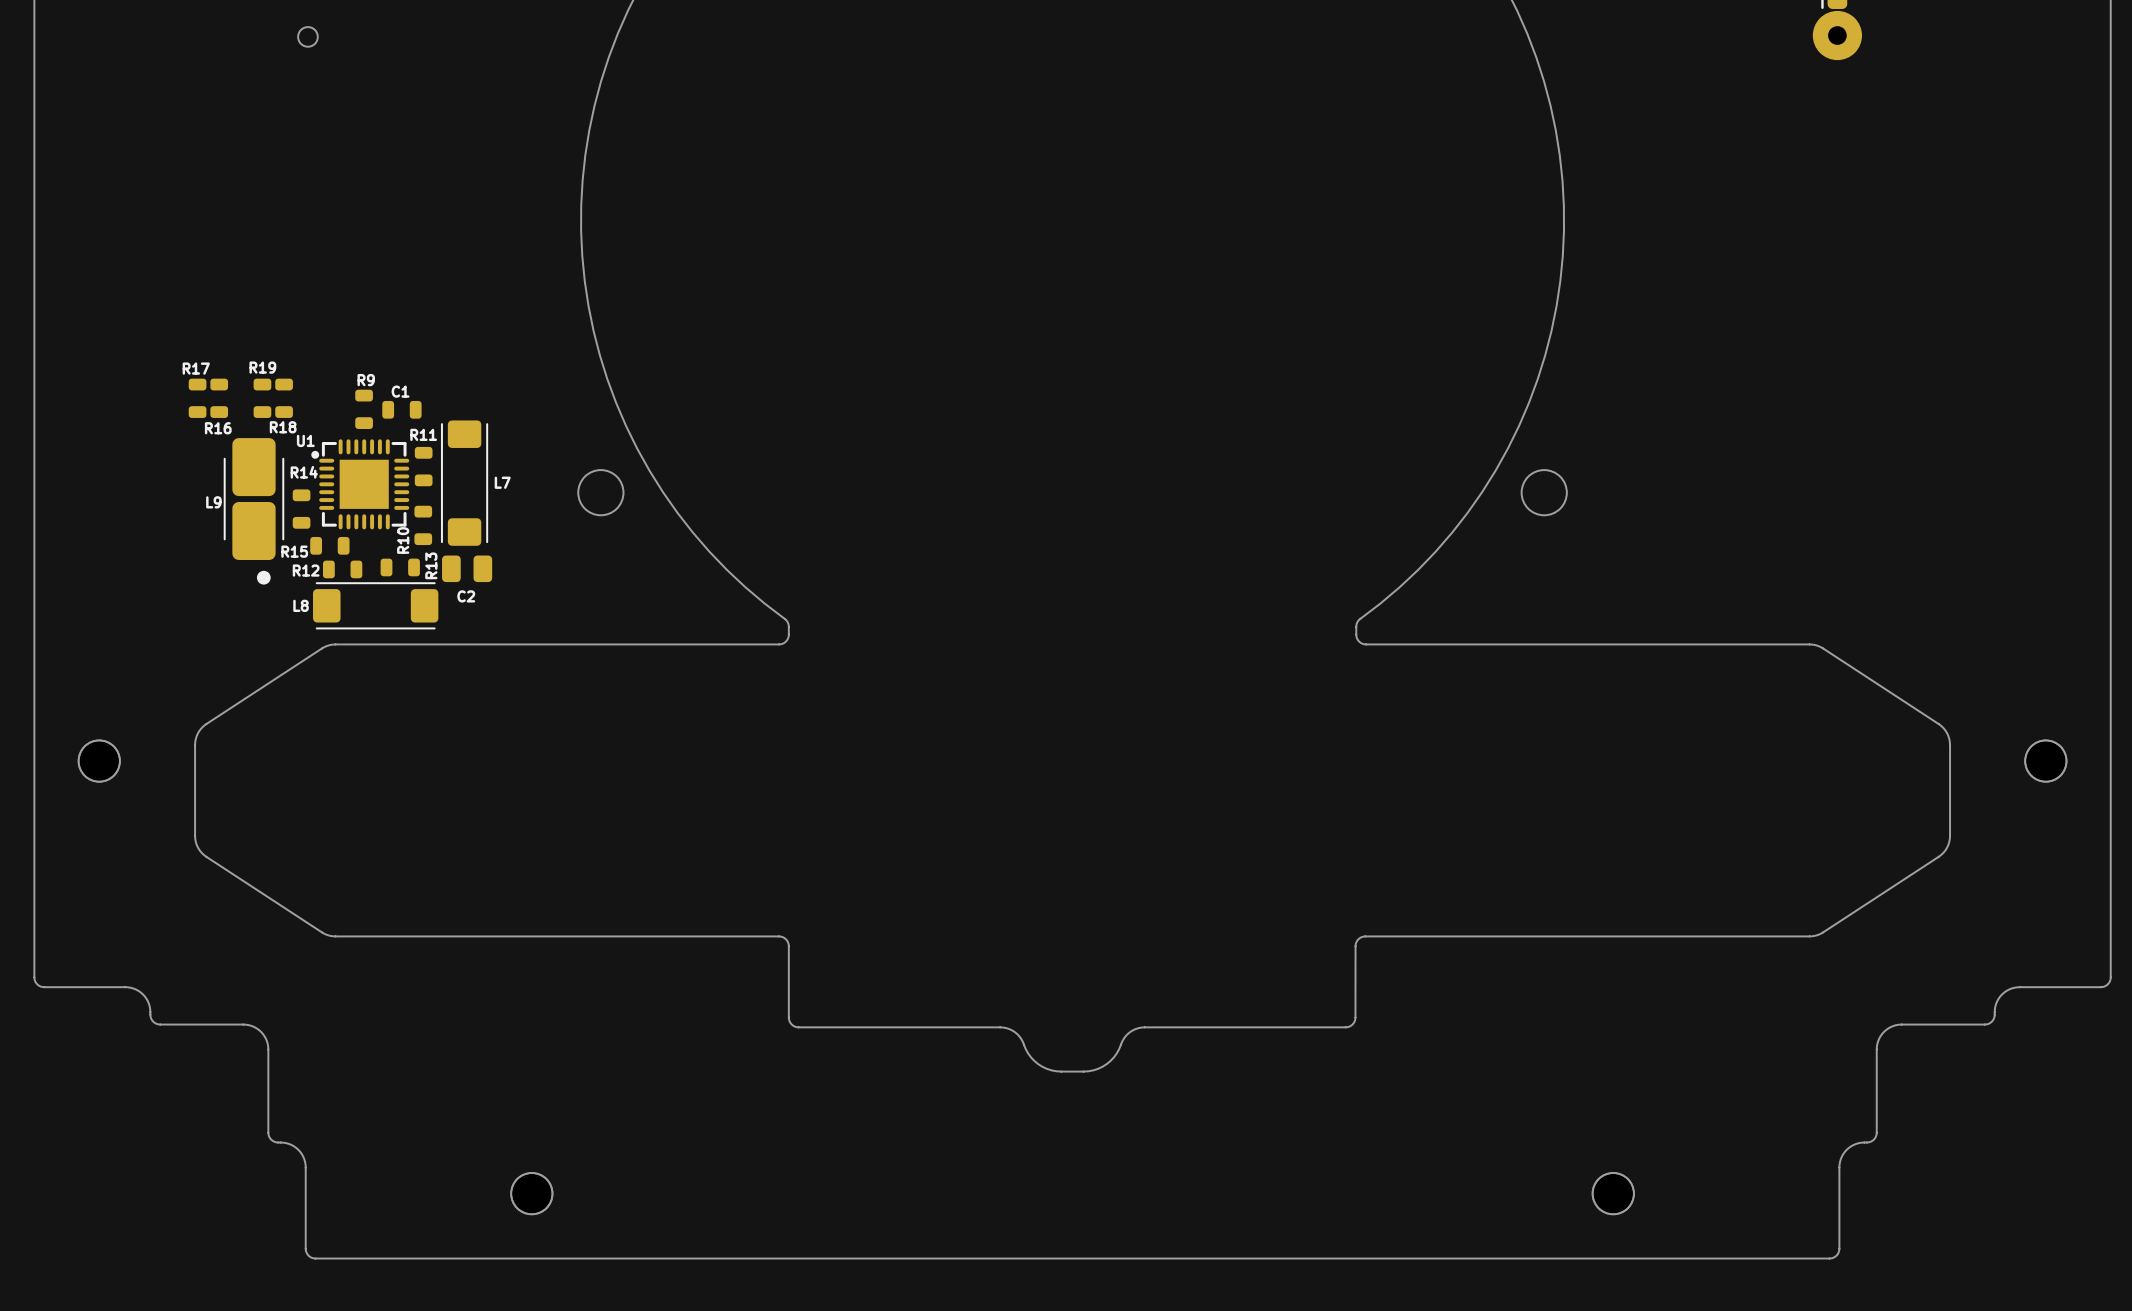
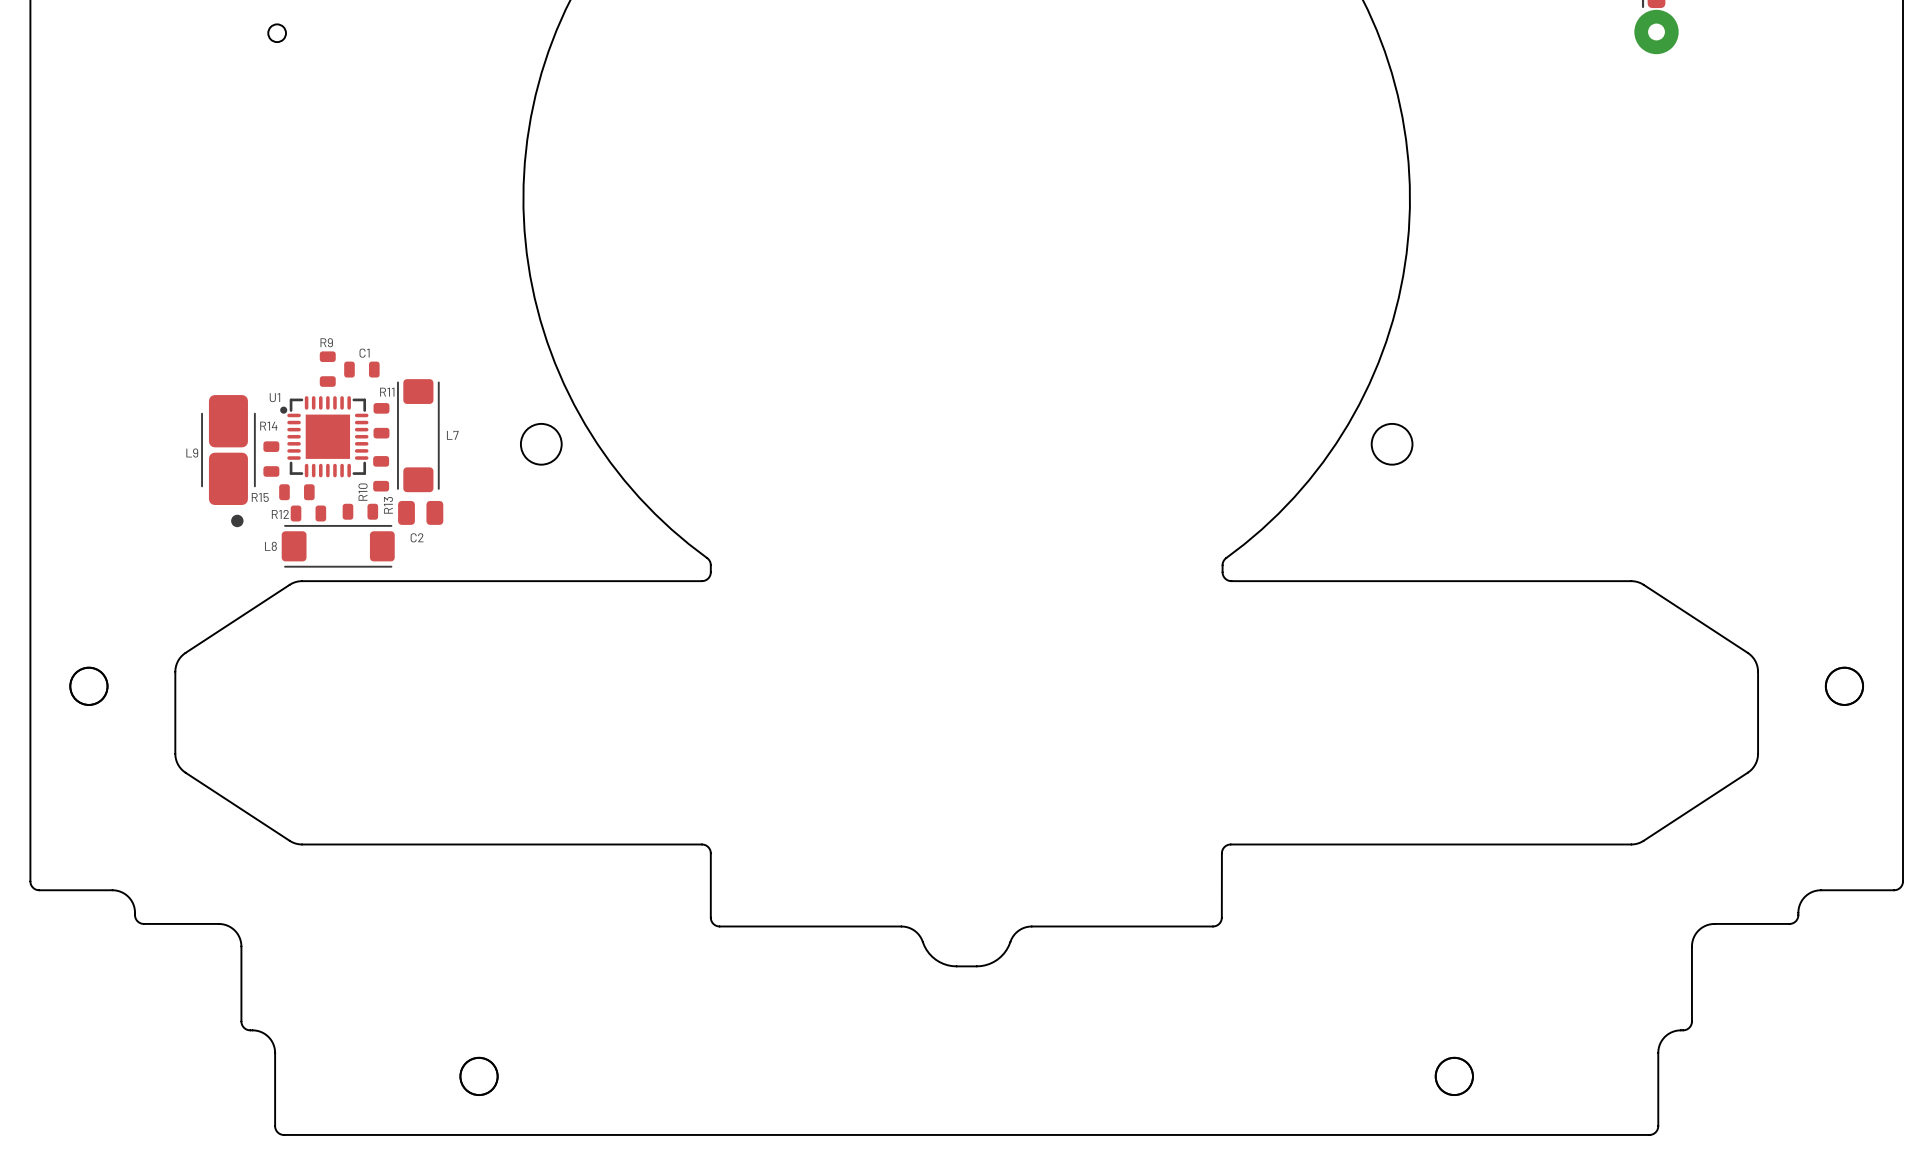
R17: (197, 398) -> none
R16: (219, 398) -> none
R19: (262, 398) -> none
R18: (284, 398) -> none

